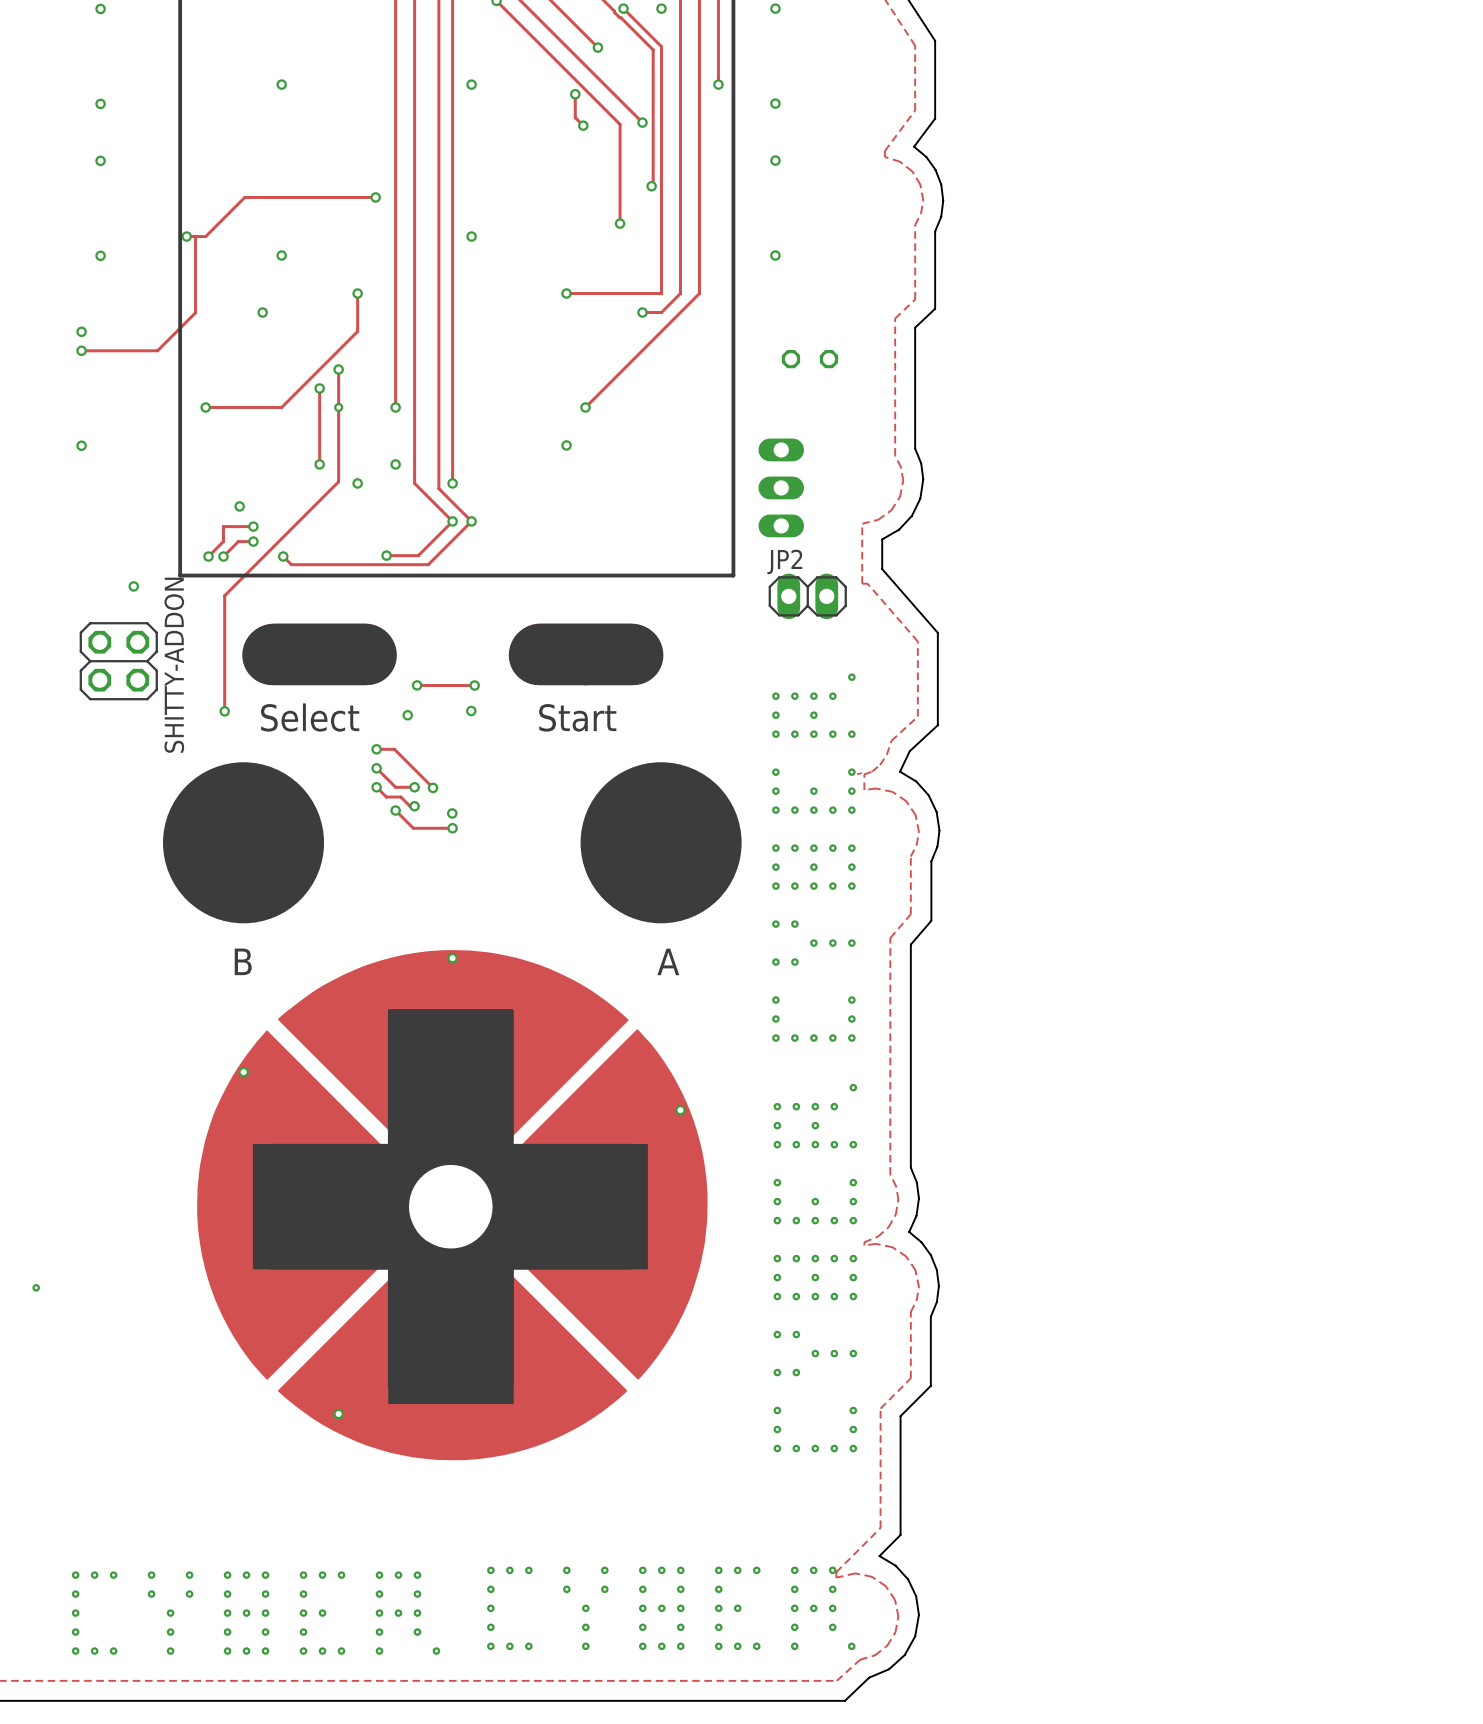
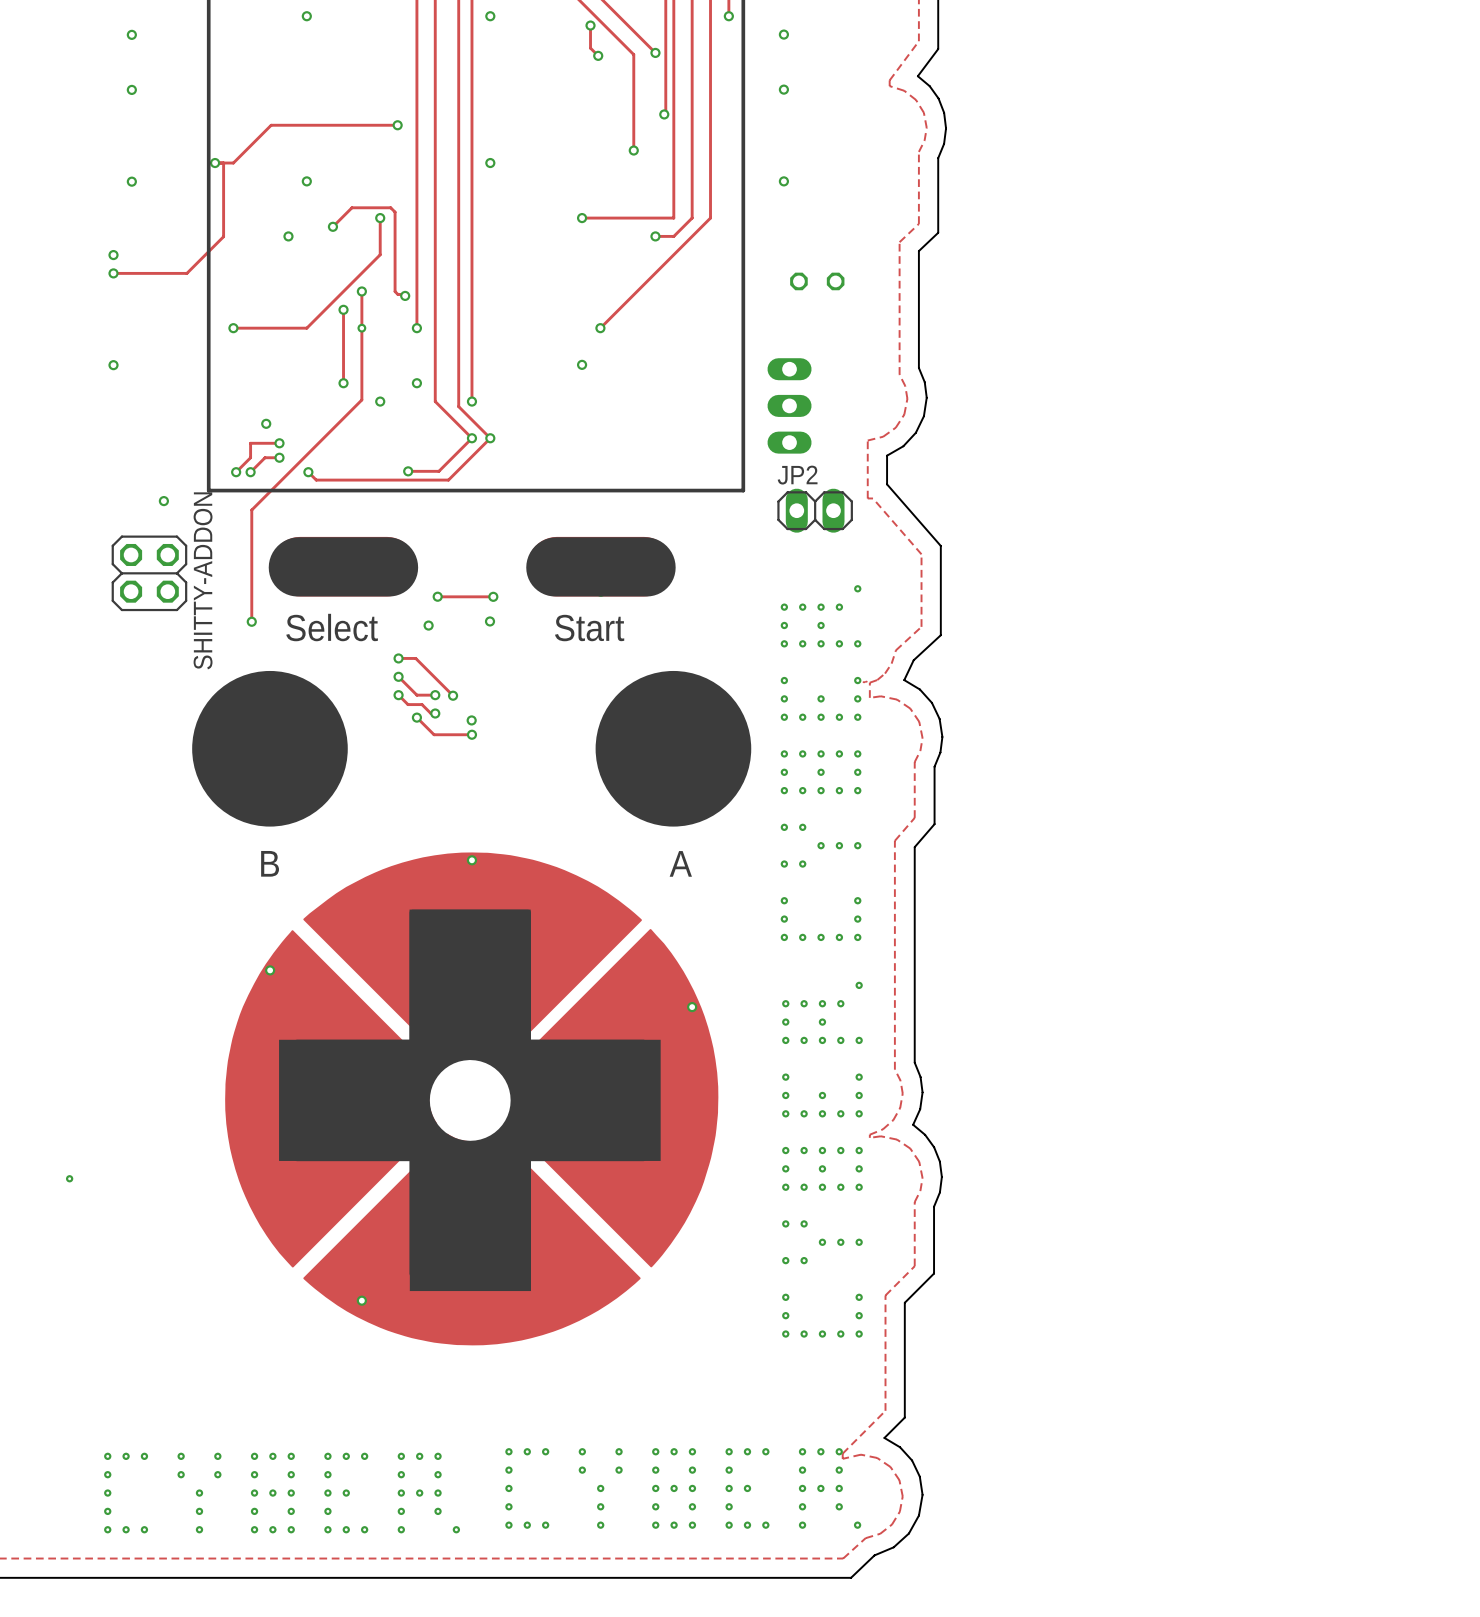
track: none -> (332, 226) (351, 207) (390, 207) (395, 212) (395, 291) (397, 294) (405, 295)
via: none -> (332, 226)
via: none -> (405, 295)

